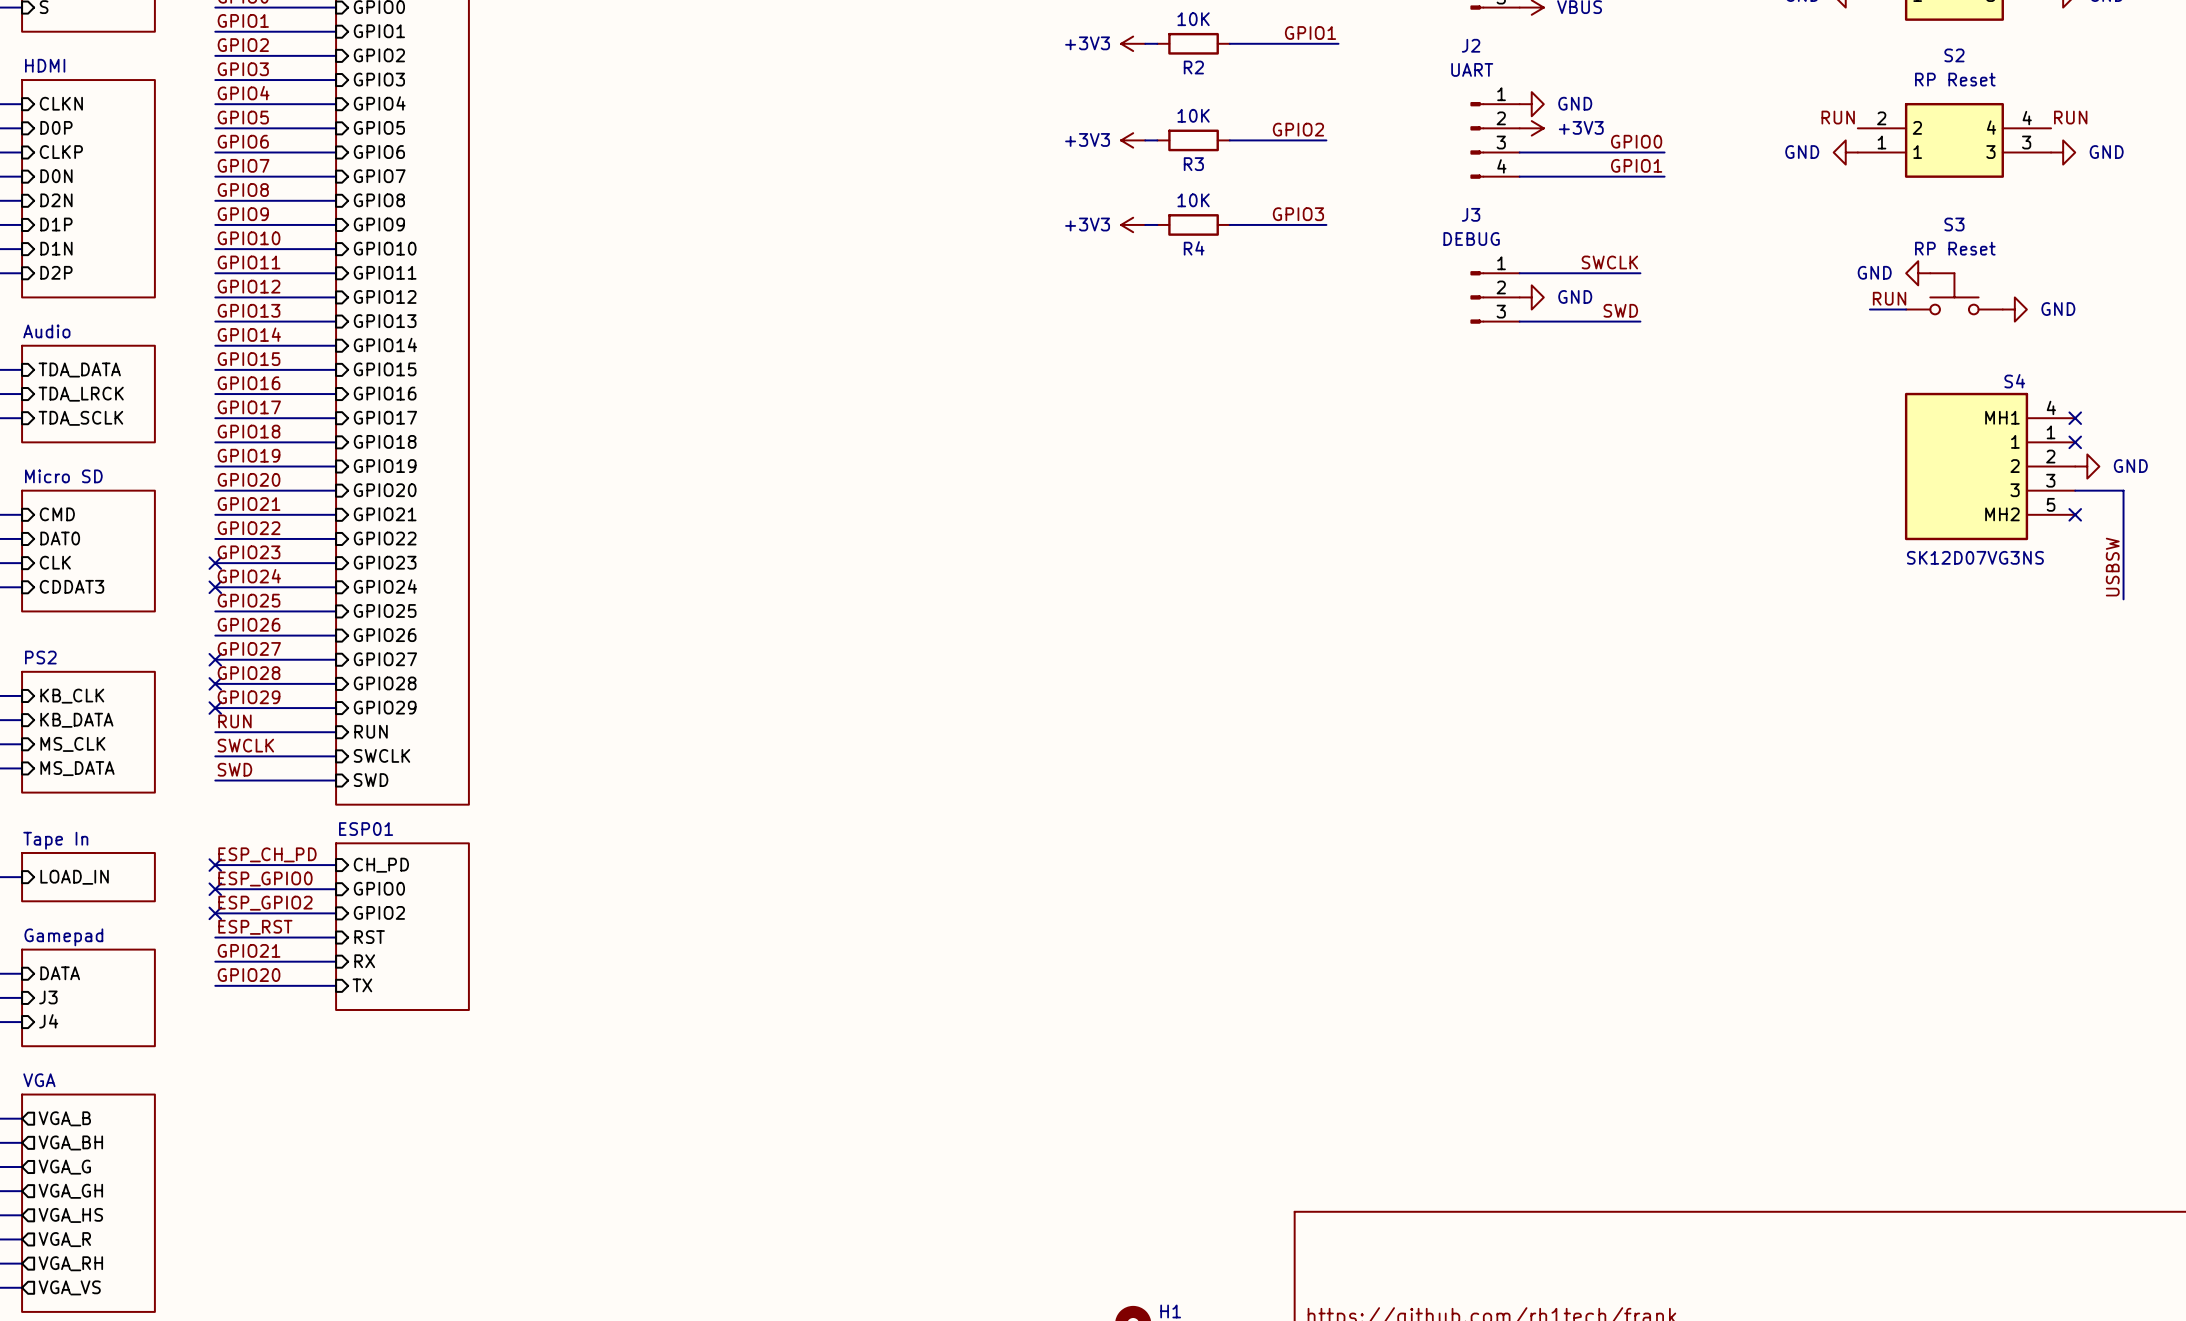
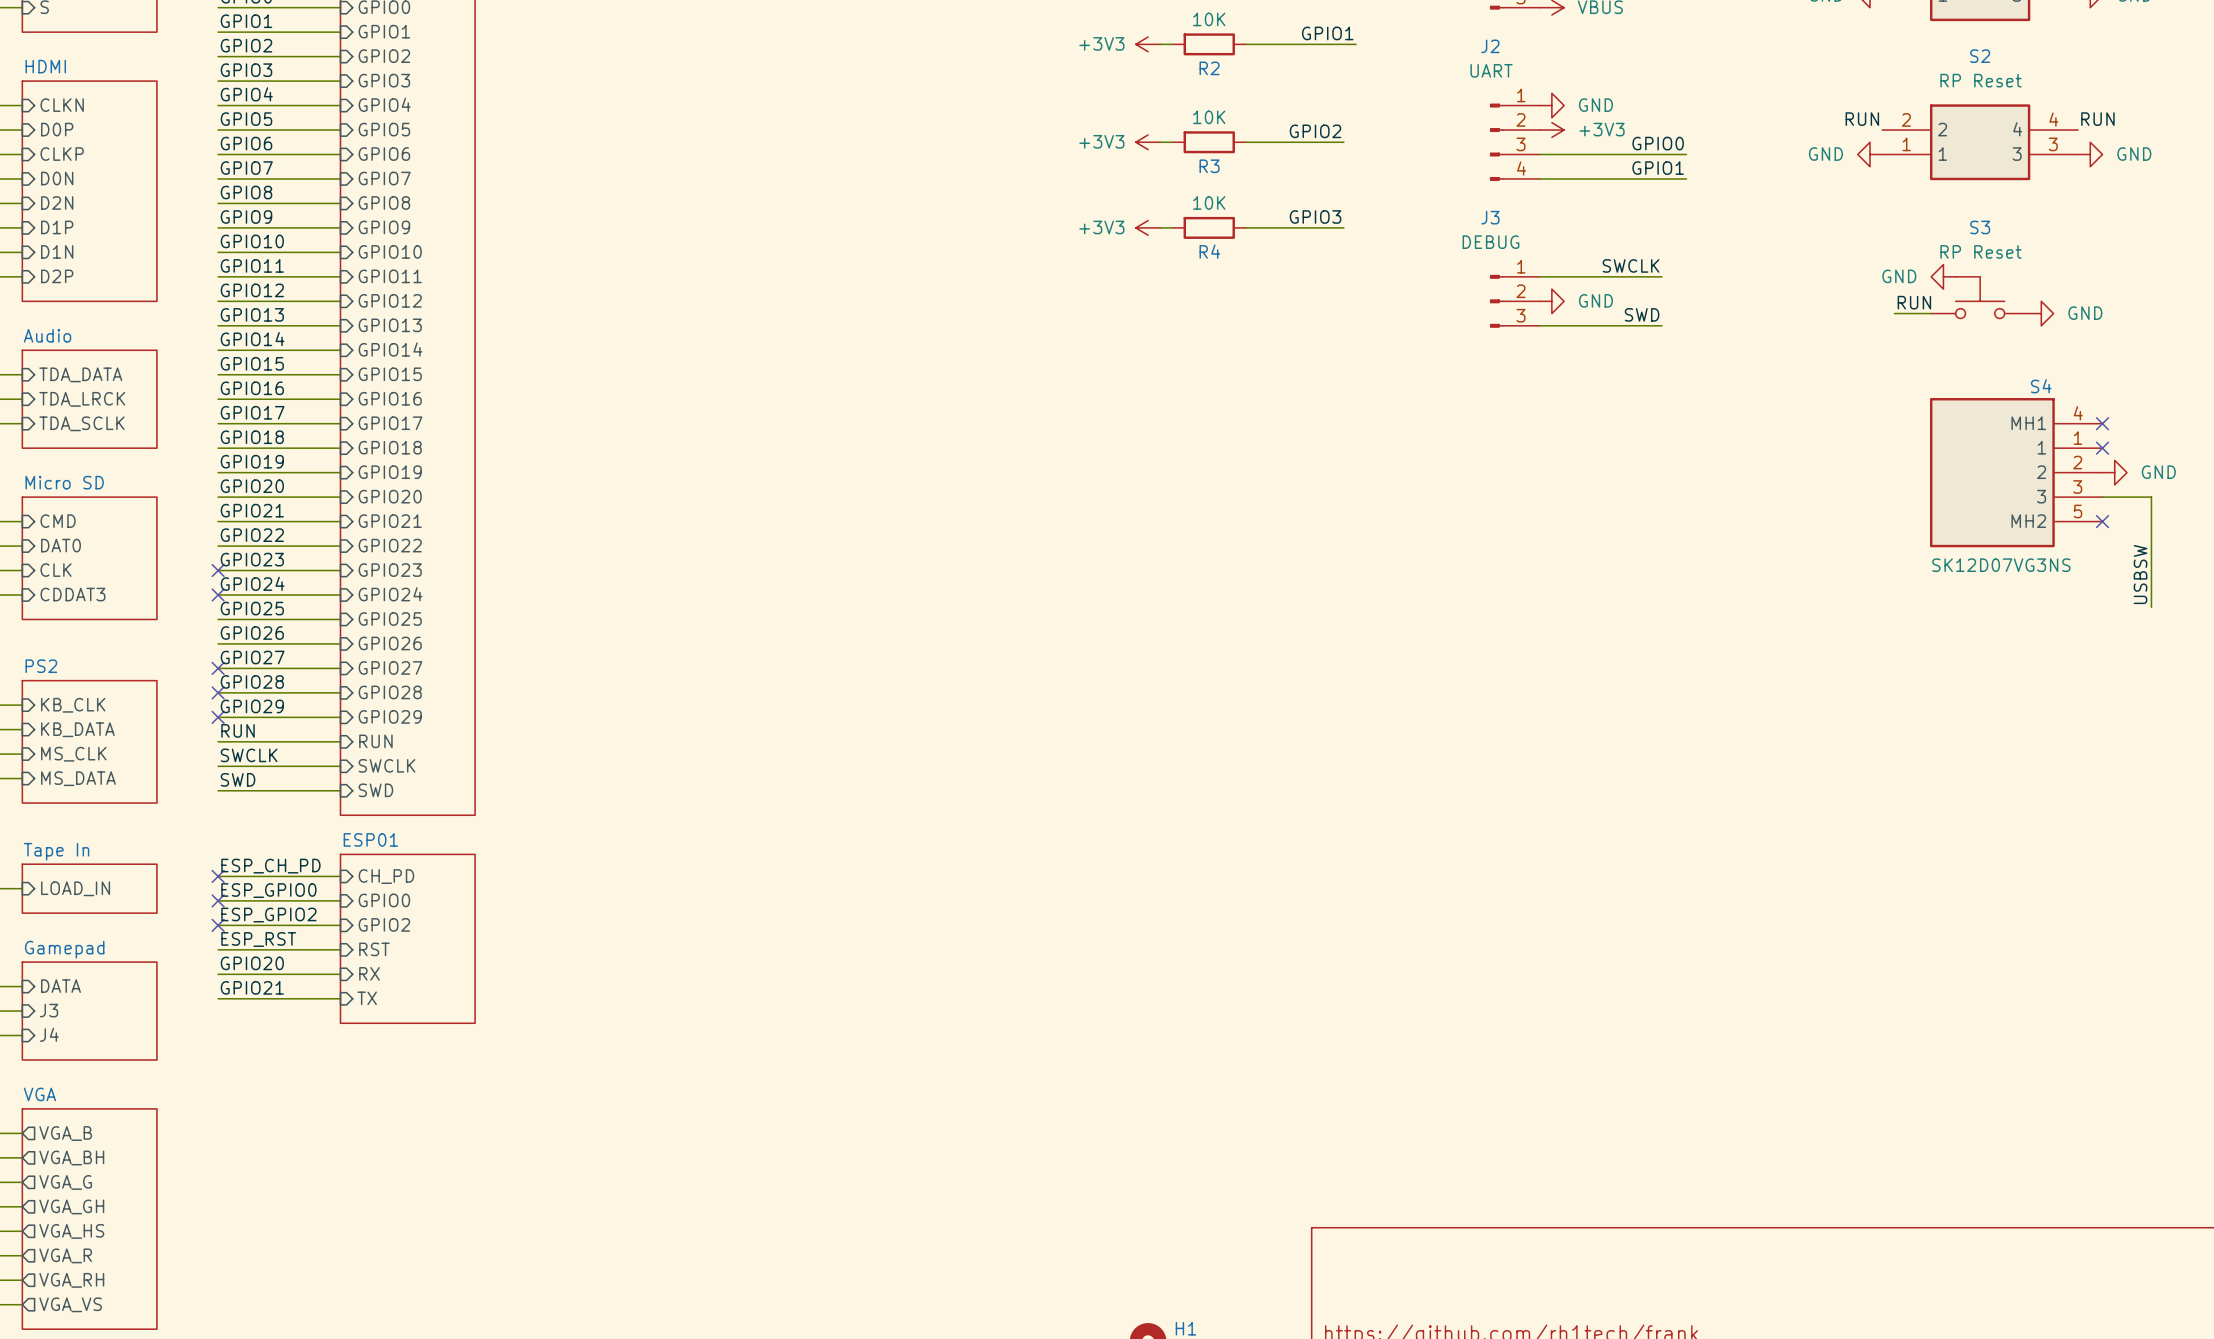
label: GPIO21 (249, 950) -> GPIO20 (252, 963)
label: GPIO20 (249, 975) -> GPIO21 (252, 987)

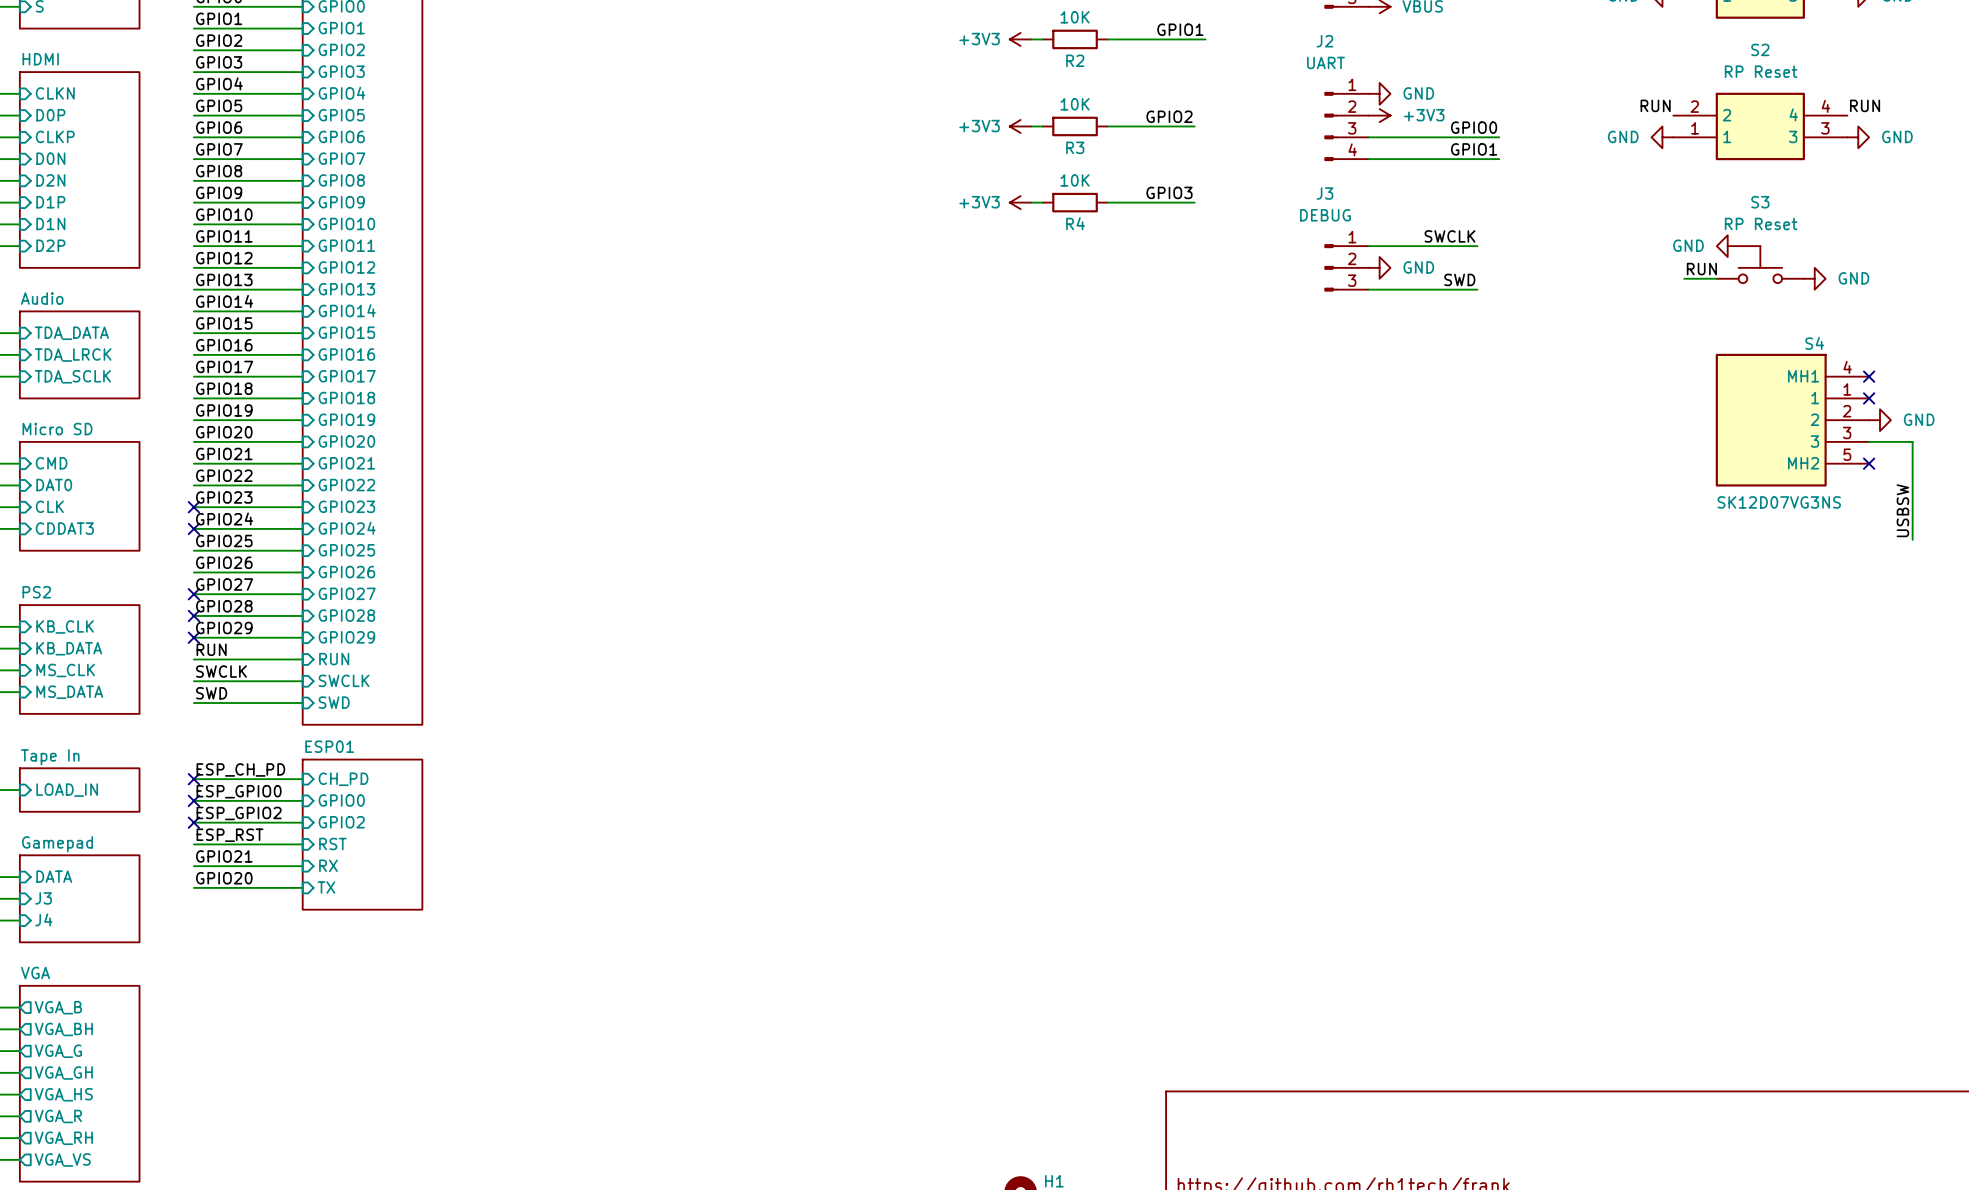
label: GPIO20 (252, 963) -> GPIO21 (224, 856)
label: GPIO21 (252, 987) -> GPIO20 (224, 878)

